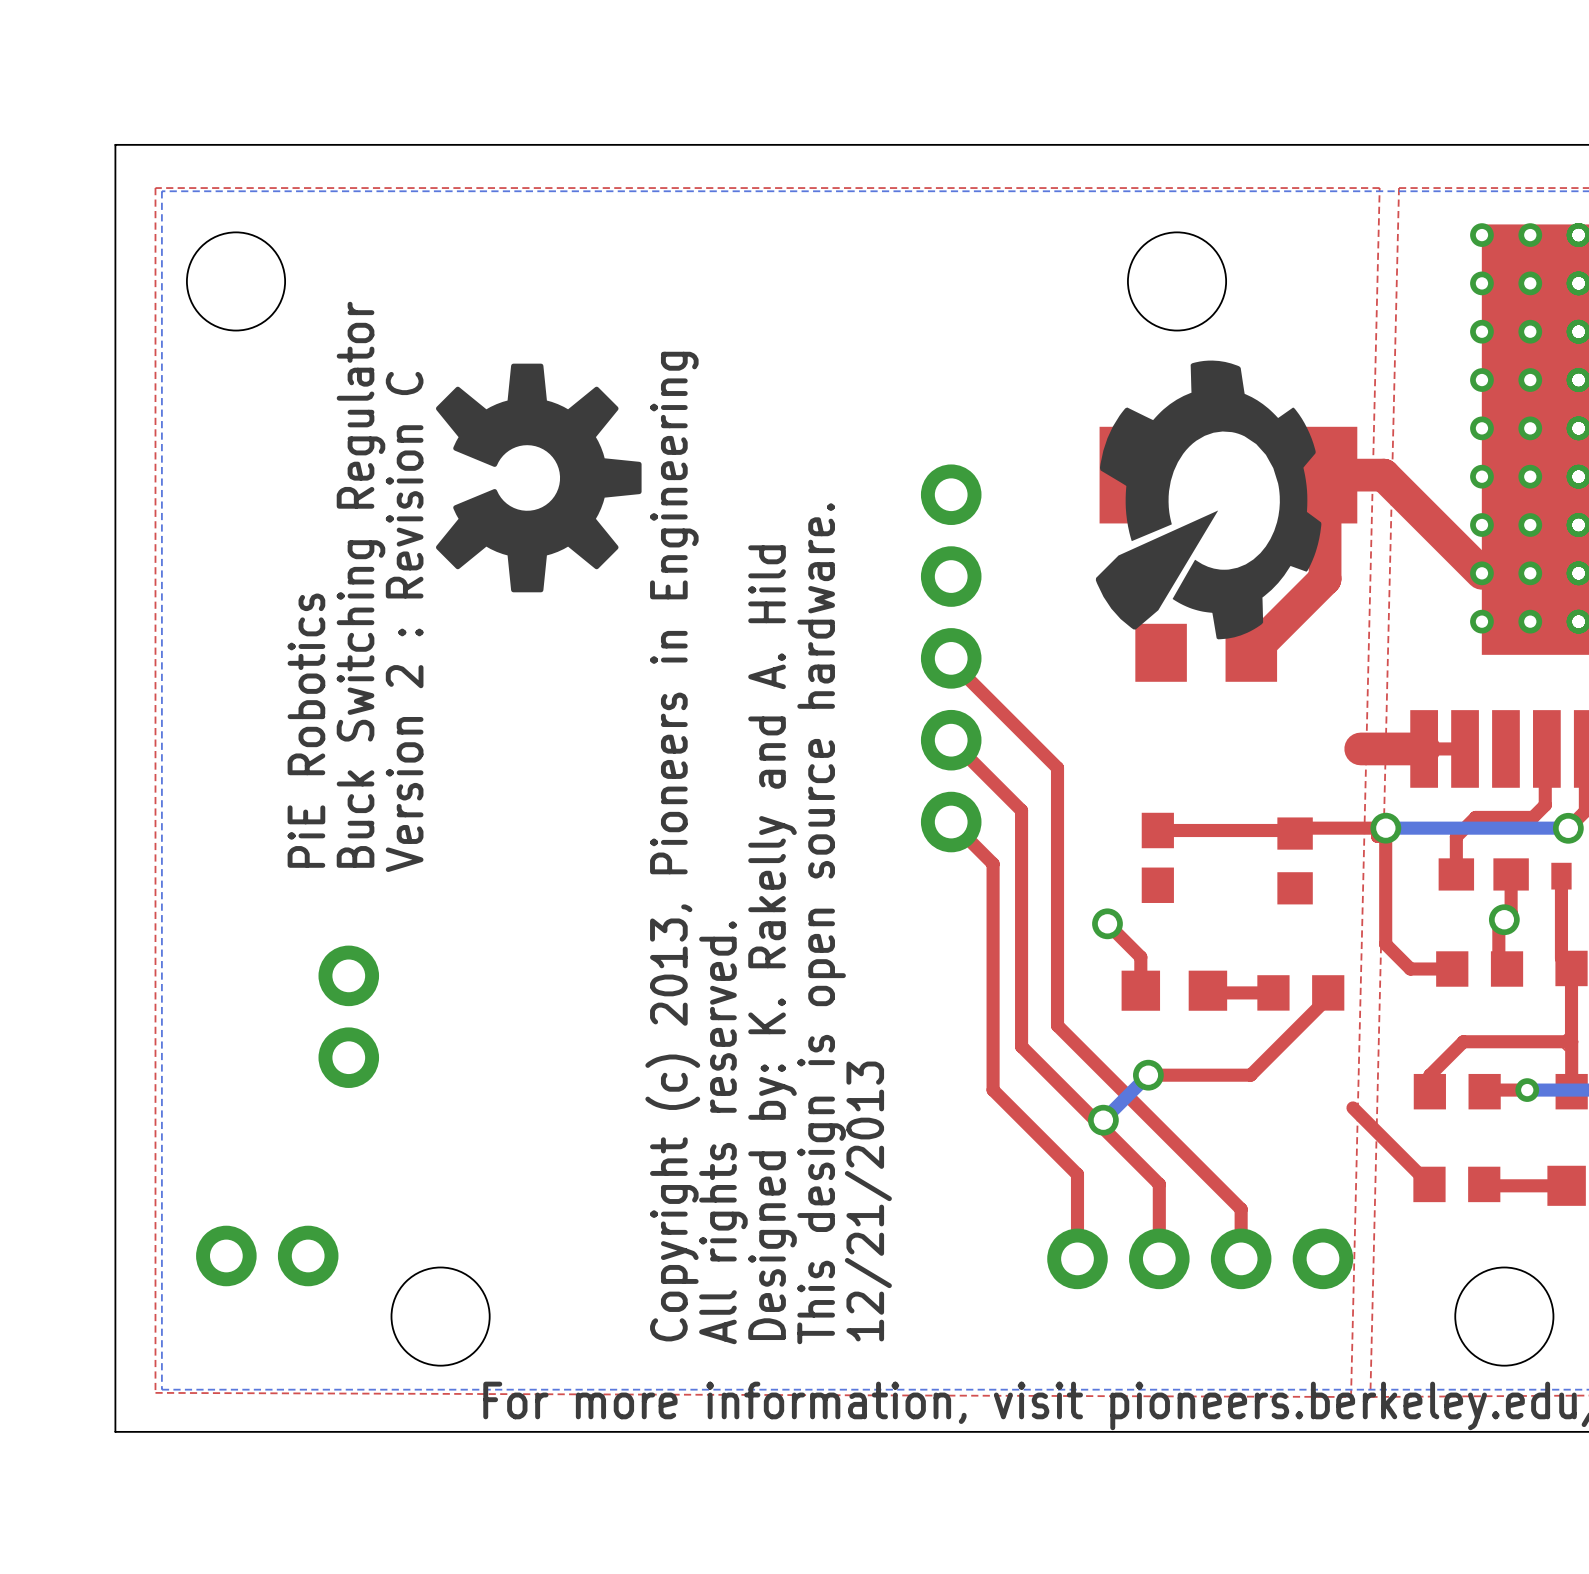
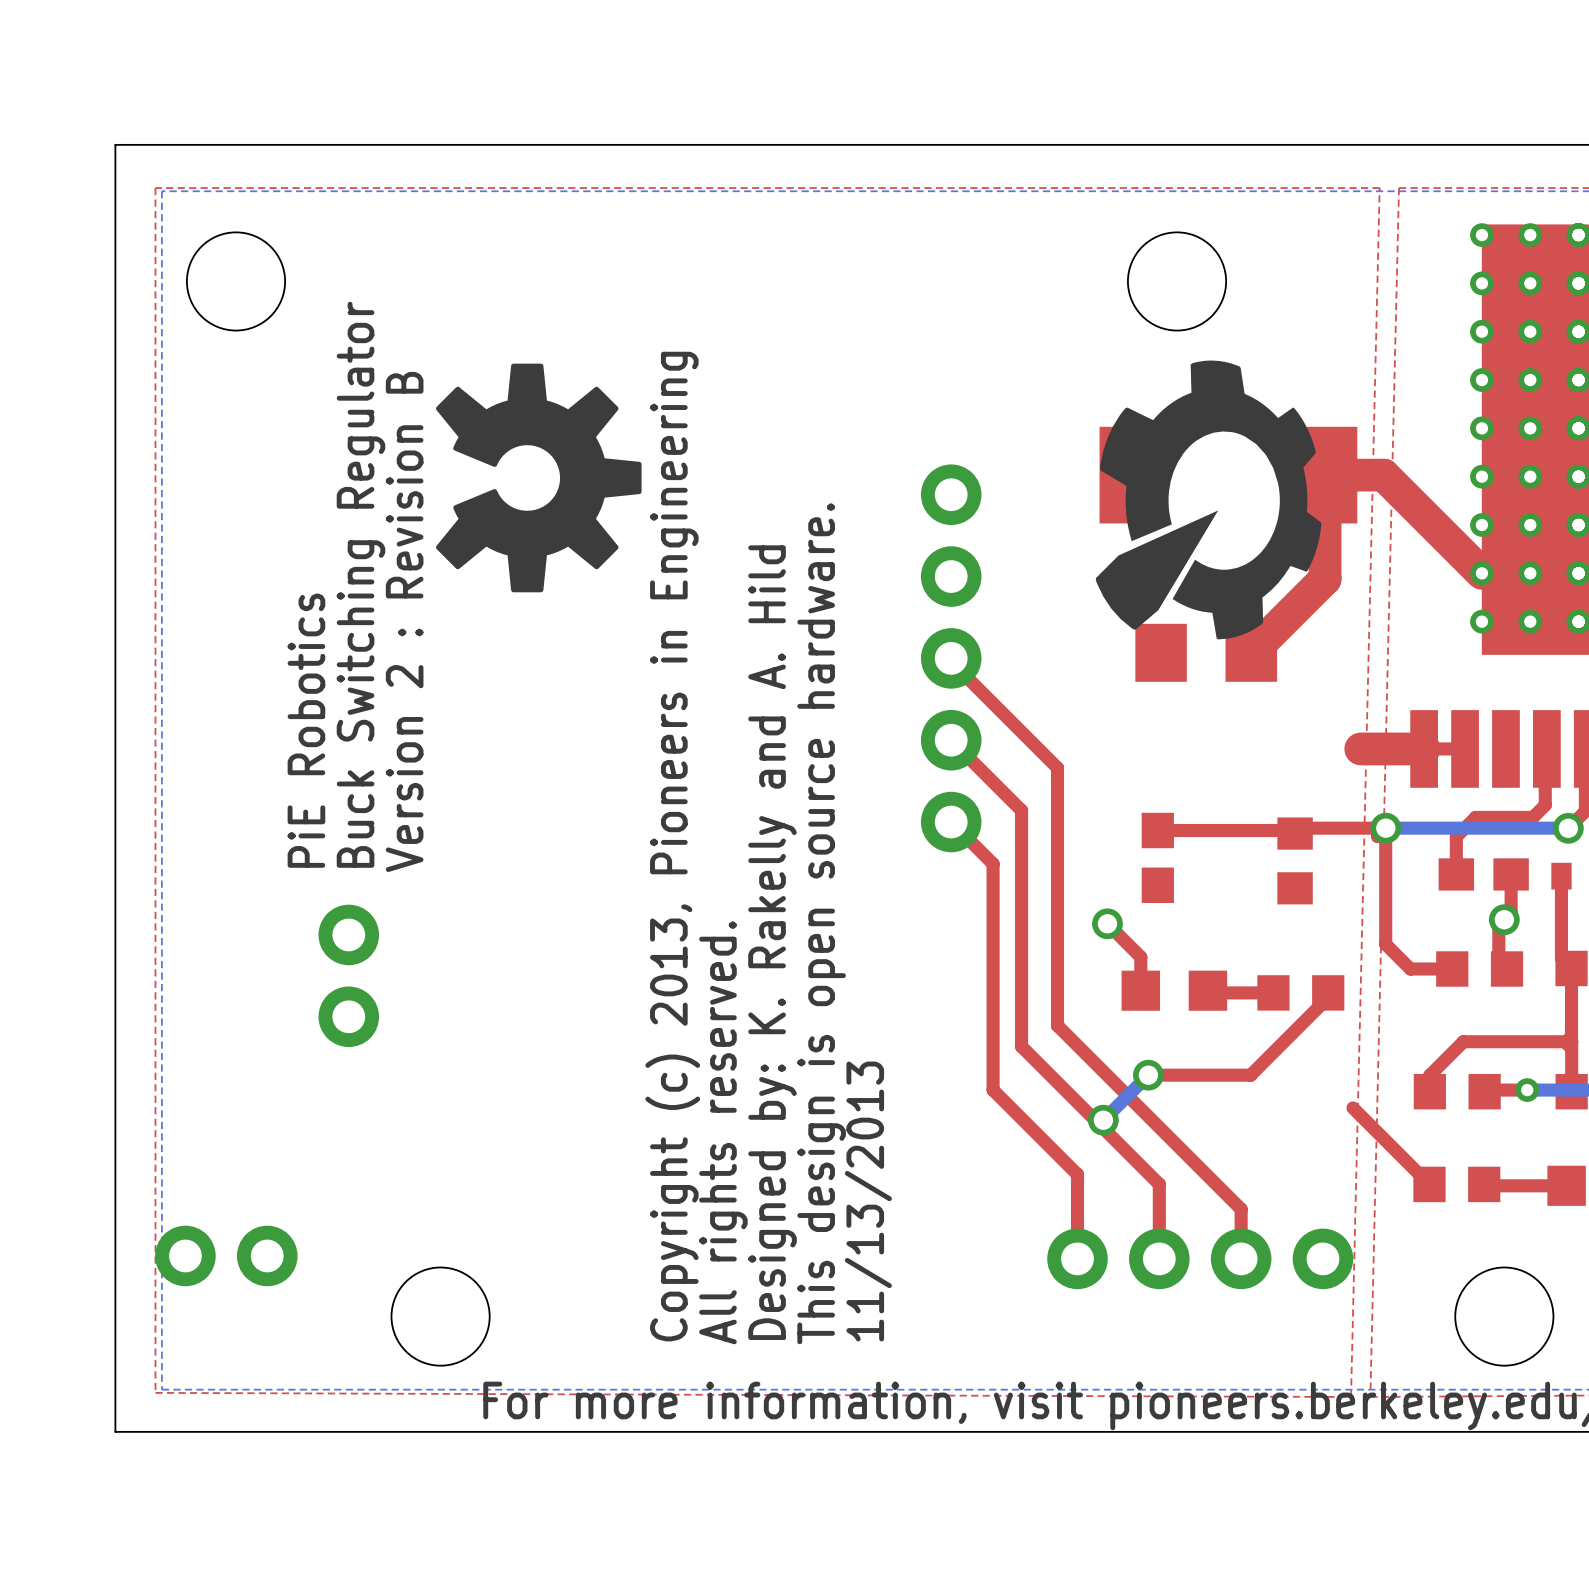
text: Version 2 : Revision C (404, 621) -> Version 2 : Revision B (404, 621)
part position: (348, 1016) -> (348, 975)
text: 12/21/2013 (868, 1201) -> 11/13/2013 (868, 1201)
part position: (267, 1255) -> (226, 1255)

